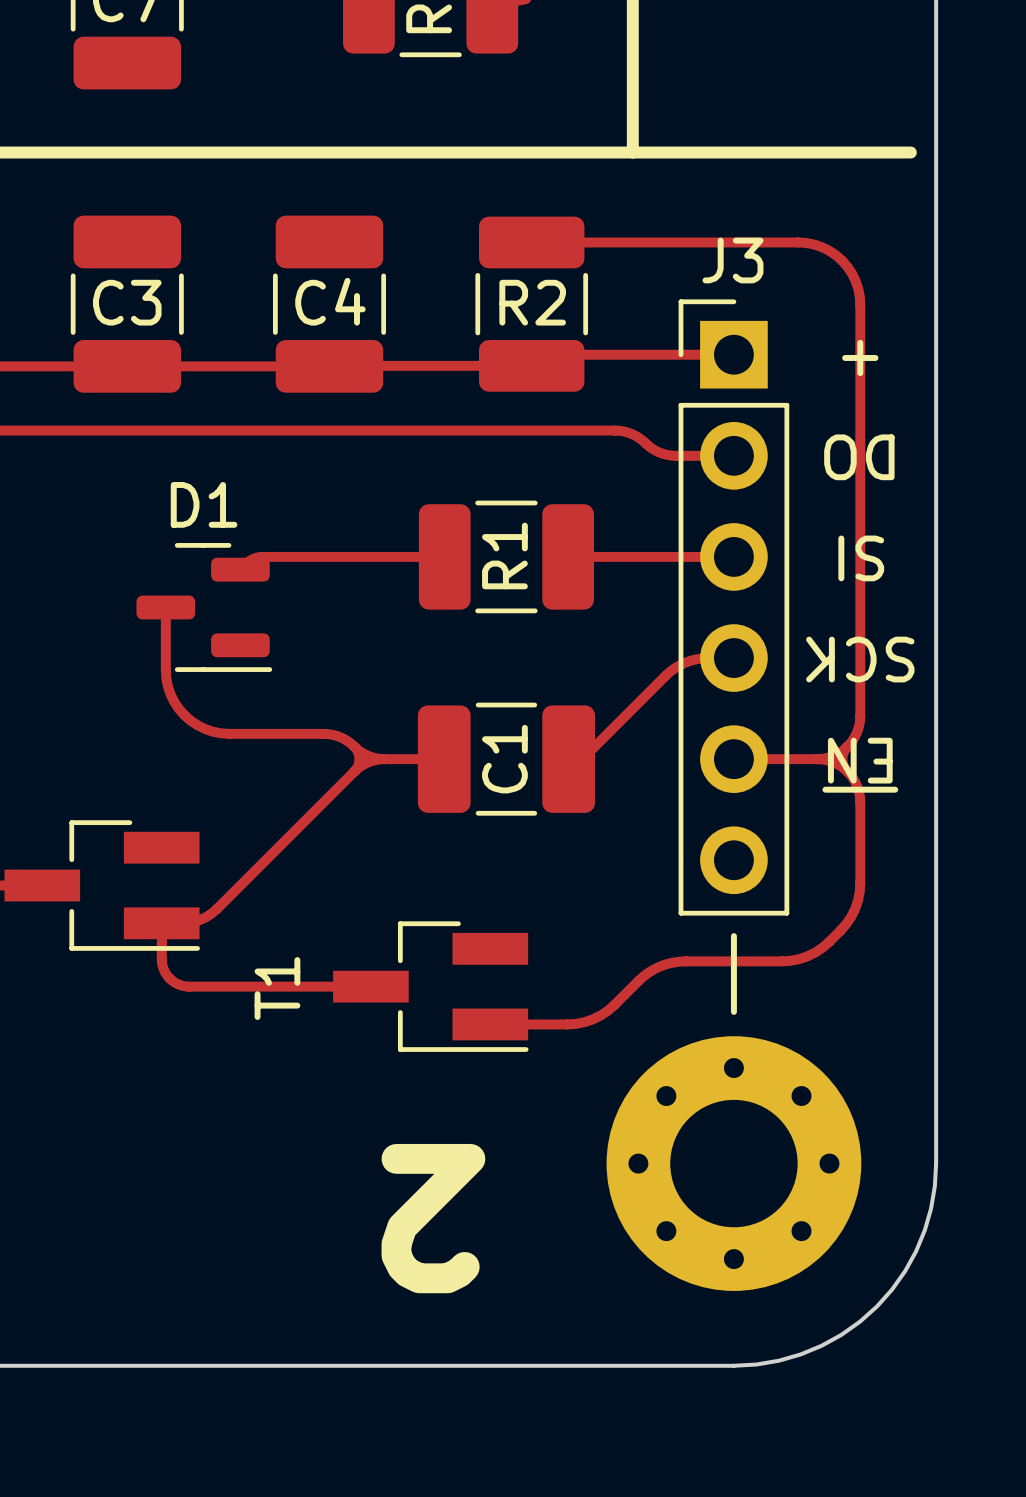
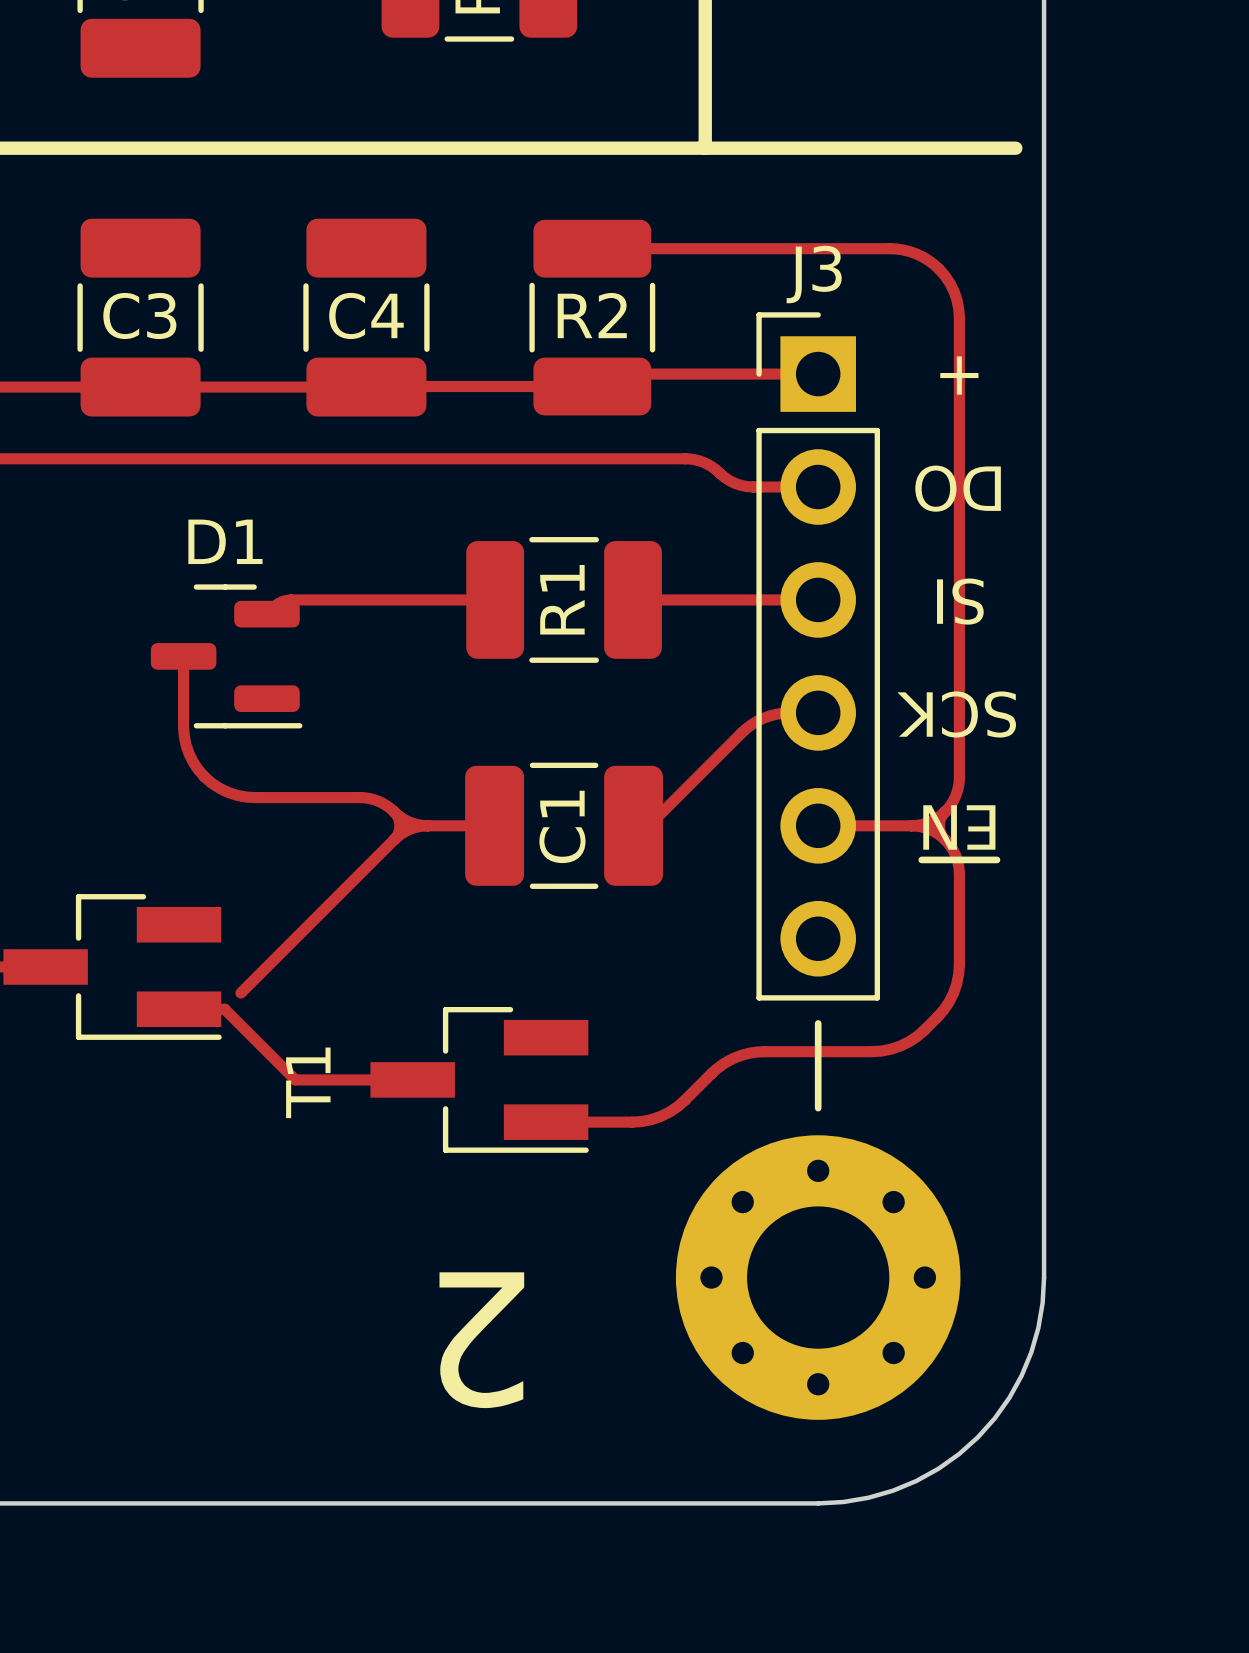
track: (217, 908) (201, 919) (175, 924) (166, 931) (161, 943) (161, 962) (165, 972) (172, 980) (185, 986) (265, 986) -> (179, 1009) (224, 1009) (295, 1079)

